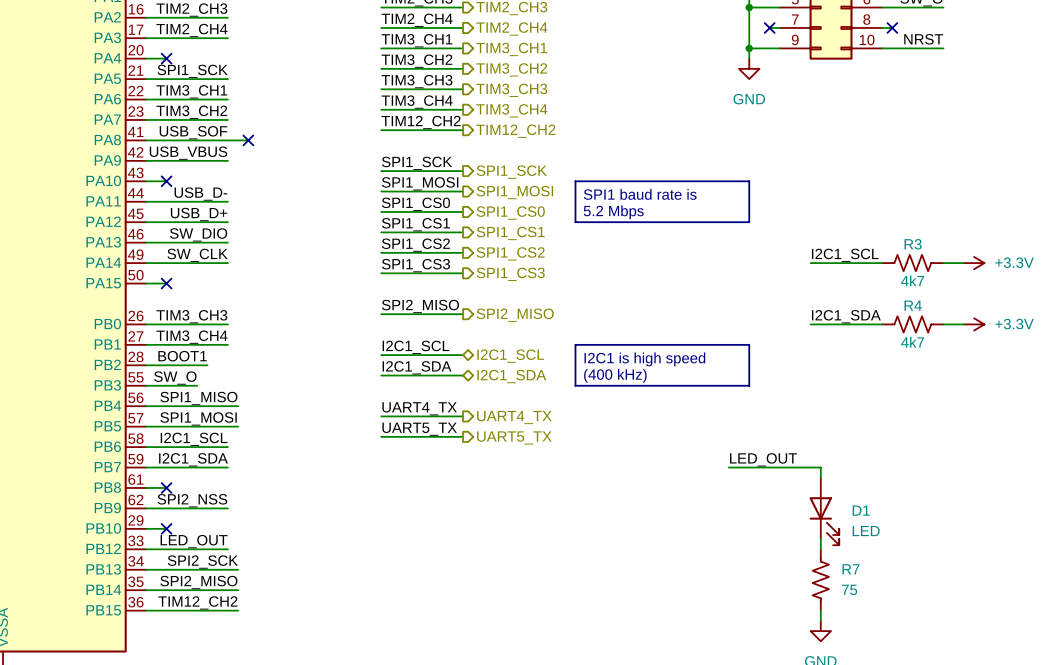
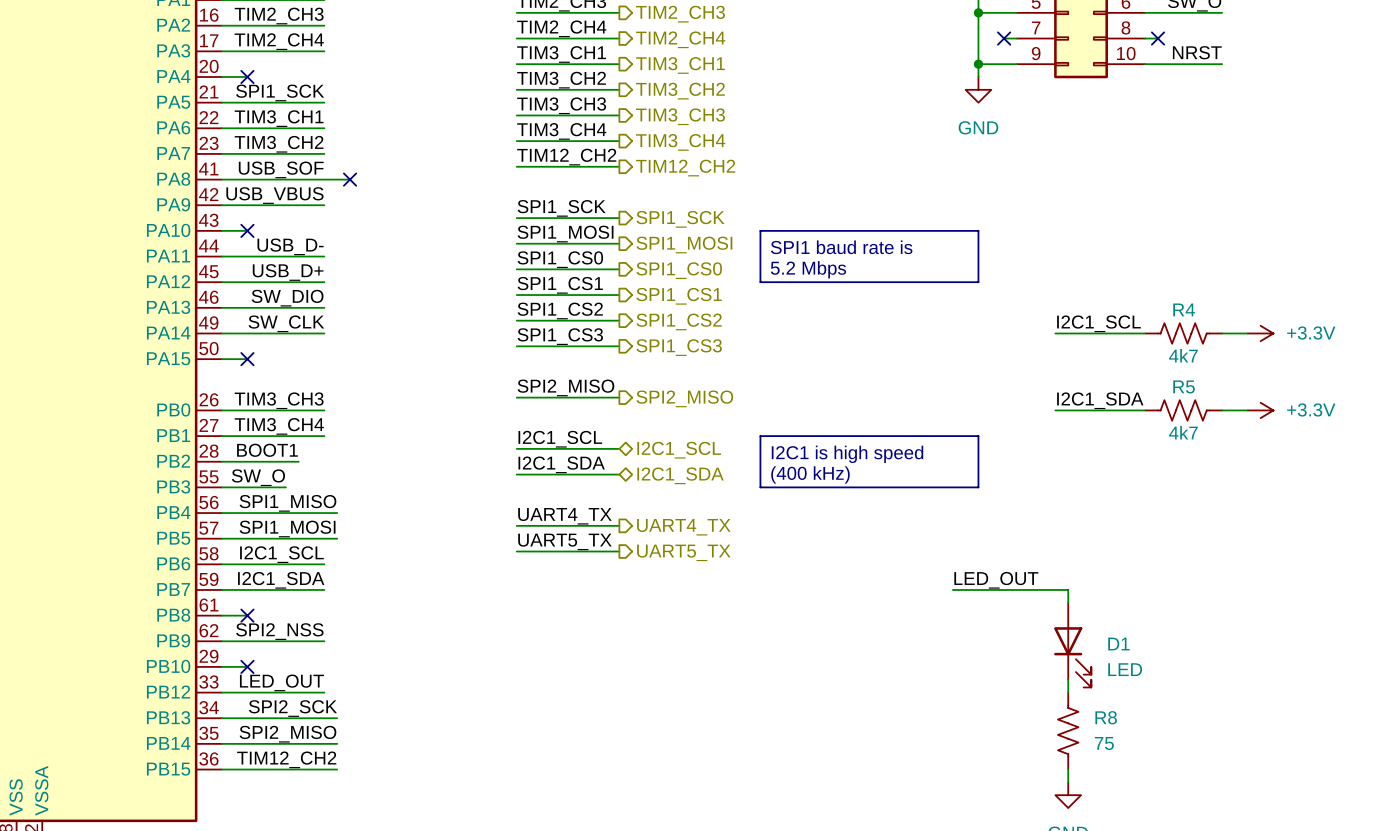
R3 name: R3 (913, 244) -> R4 (1184, 309)
R4 name: R4 (913, 305) -> R5 (1184, 386)
R7 name: R7 (850, 569) -> R8 (1106, 717)

